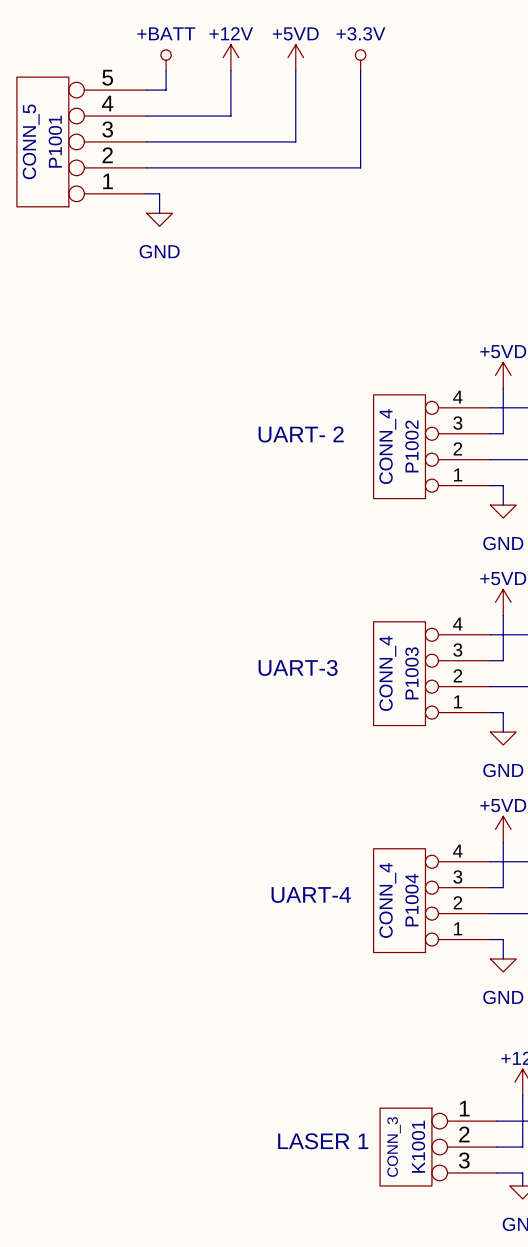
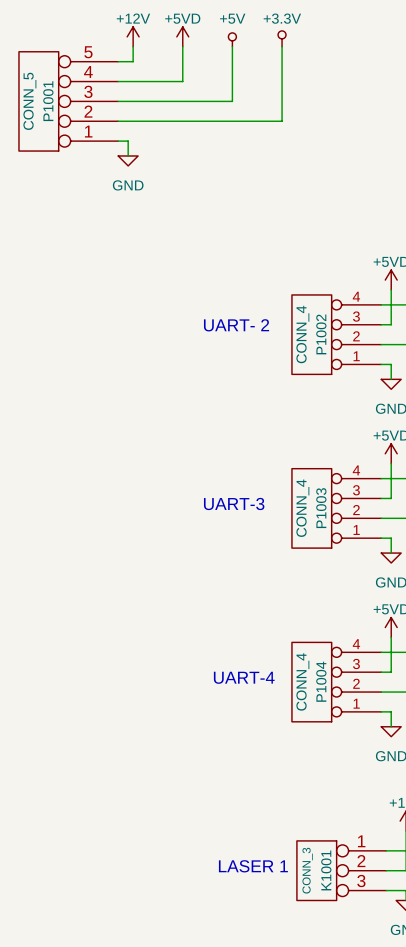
power symbol: +12V (230, 57) -> +5VD (182, 36)
power symbol: +5VD (295, 57) -> +5V (232, 39)
power symbol: +BATT (166, 60) -> +12V (133, 36)

